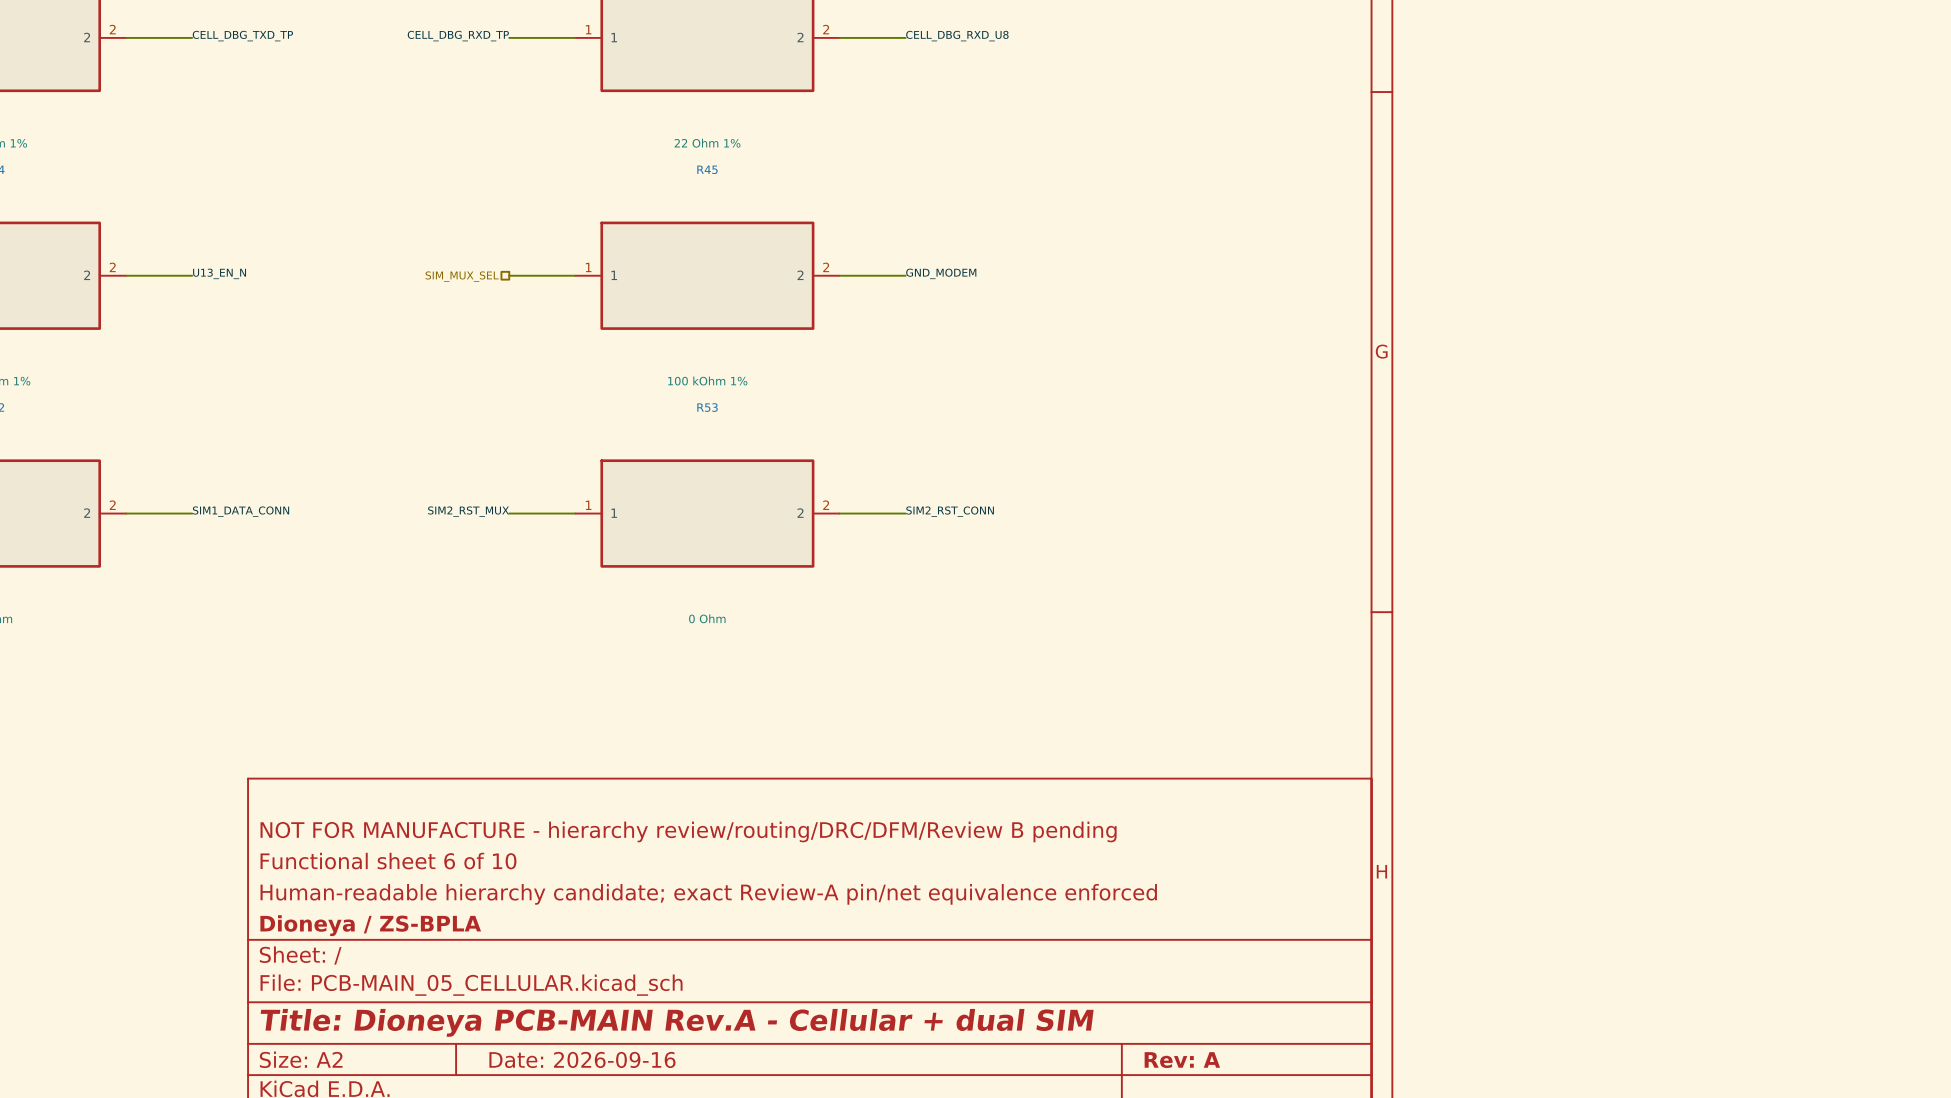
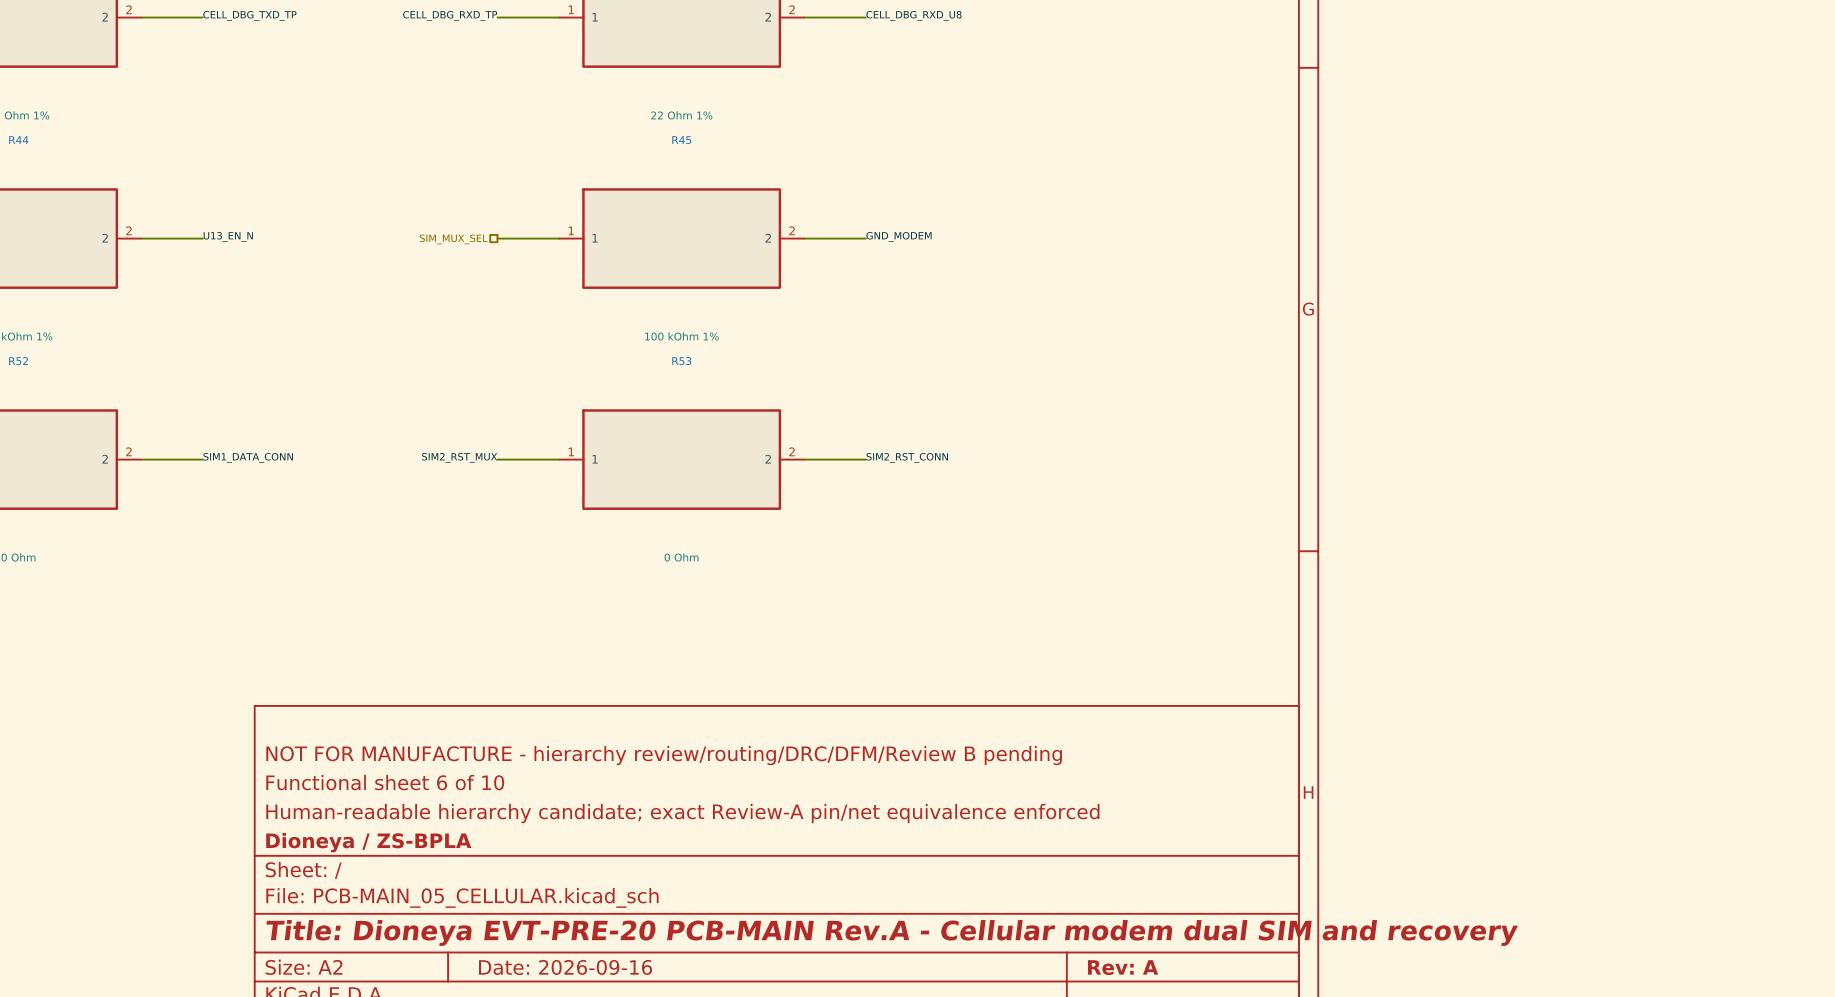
title block: Title: Dioneya PCB-MAIN Rev.A - Cellular + dual SIM (677, 1022) -> Title: Dioneya EVT-PRE-20 PCB-MAIN Rev.A - Cellular modem dual SIM and recovery (892, 932)

